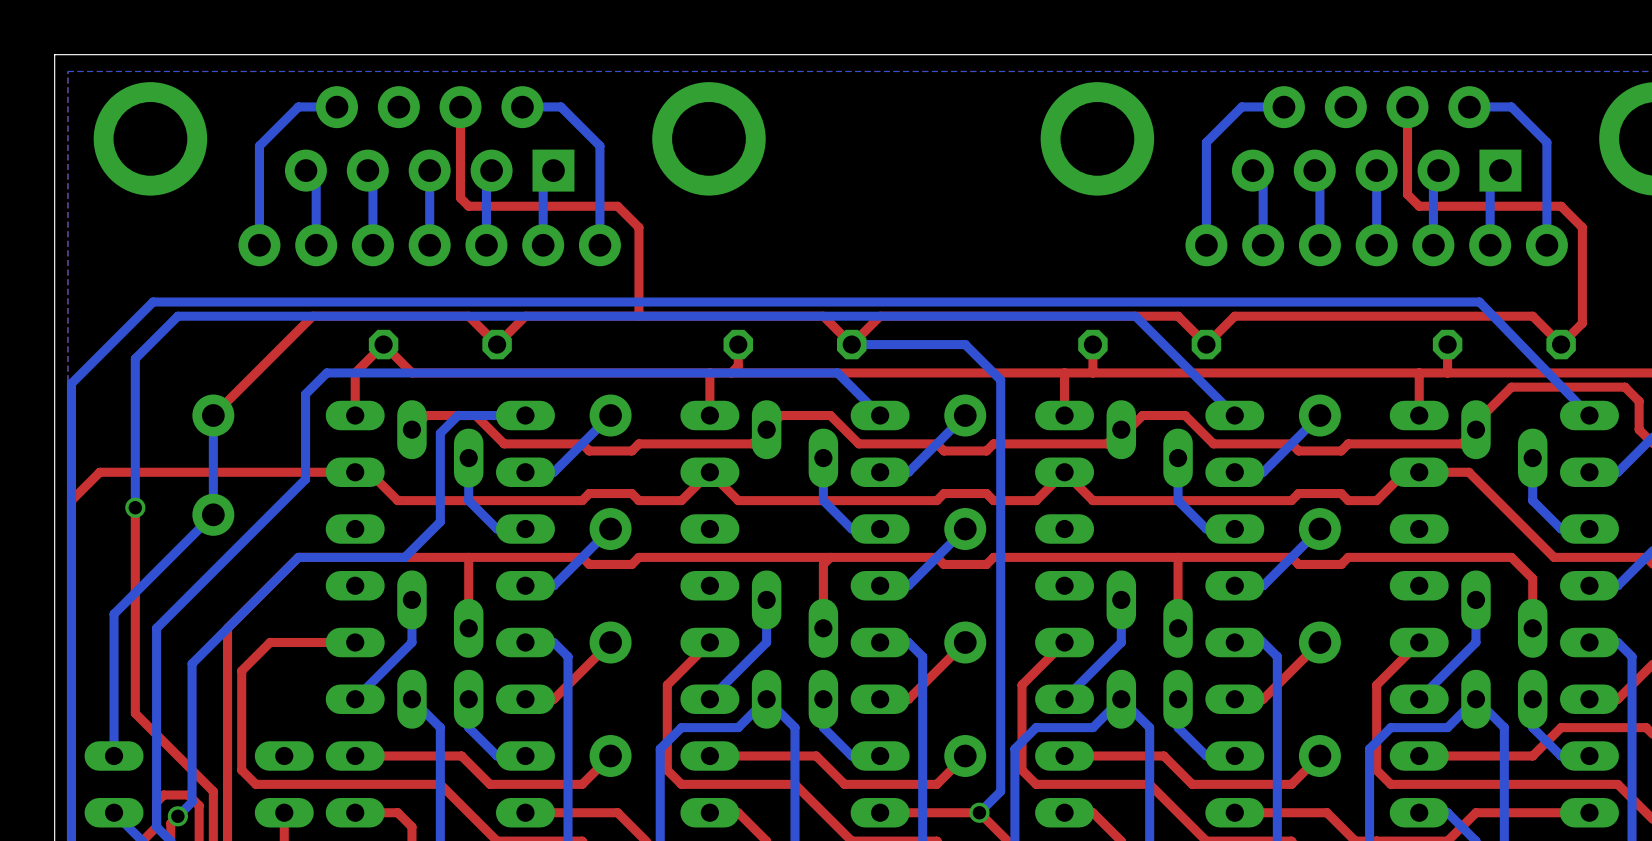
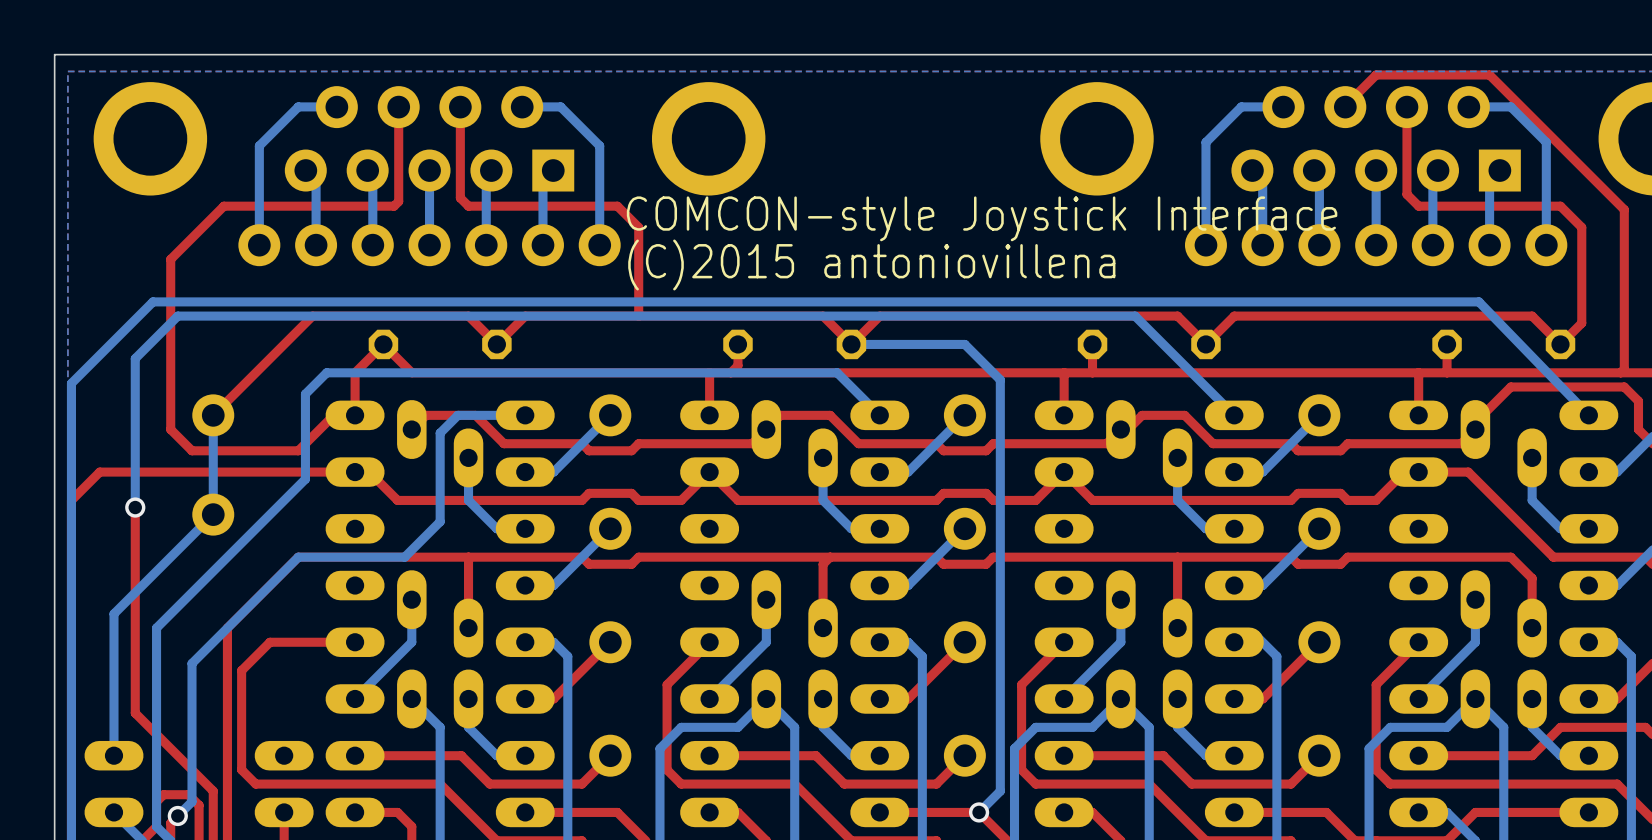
top track: none -> (398, 107) (398, 201) (394, 206) (223, 206) (170, 259) (170, 429) (191, 450) (298, 450) (333, 415) (355, 415)
top track: none -> (1345, 107) (1376, 75) (1489, 75) (1624, 209) (1624, 369) (1620, 372)
text: none -> COMCON-style Joystick Interface (982, 218)
text: none -> (C)2015 antoniovillena (871, 264)

